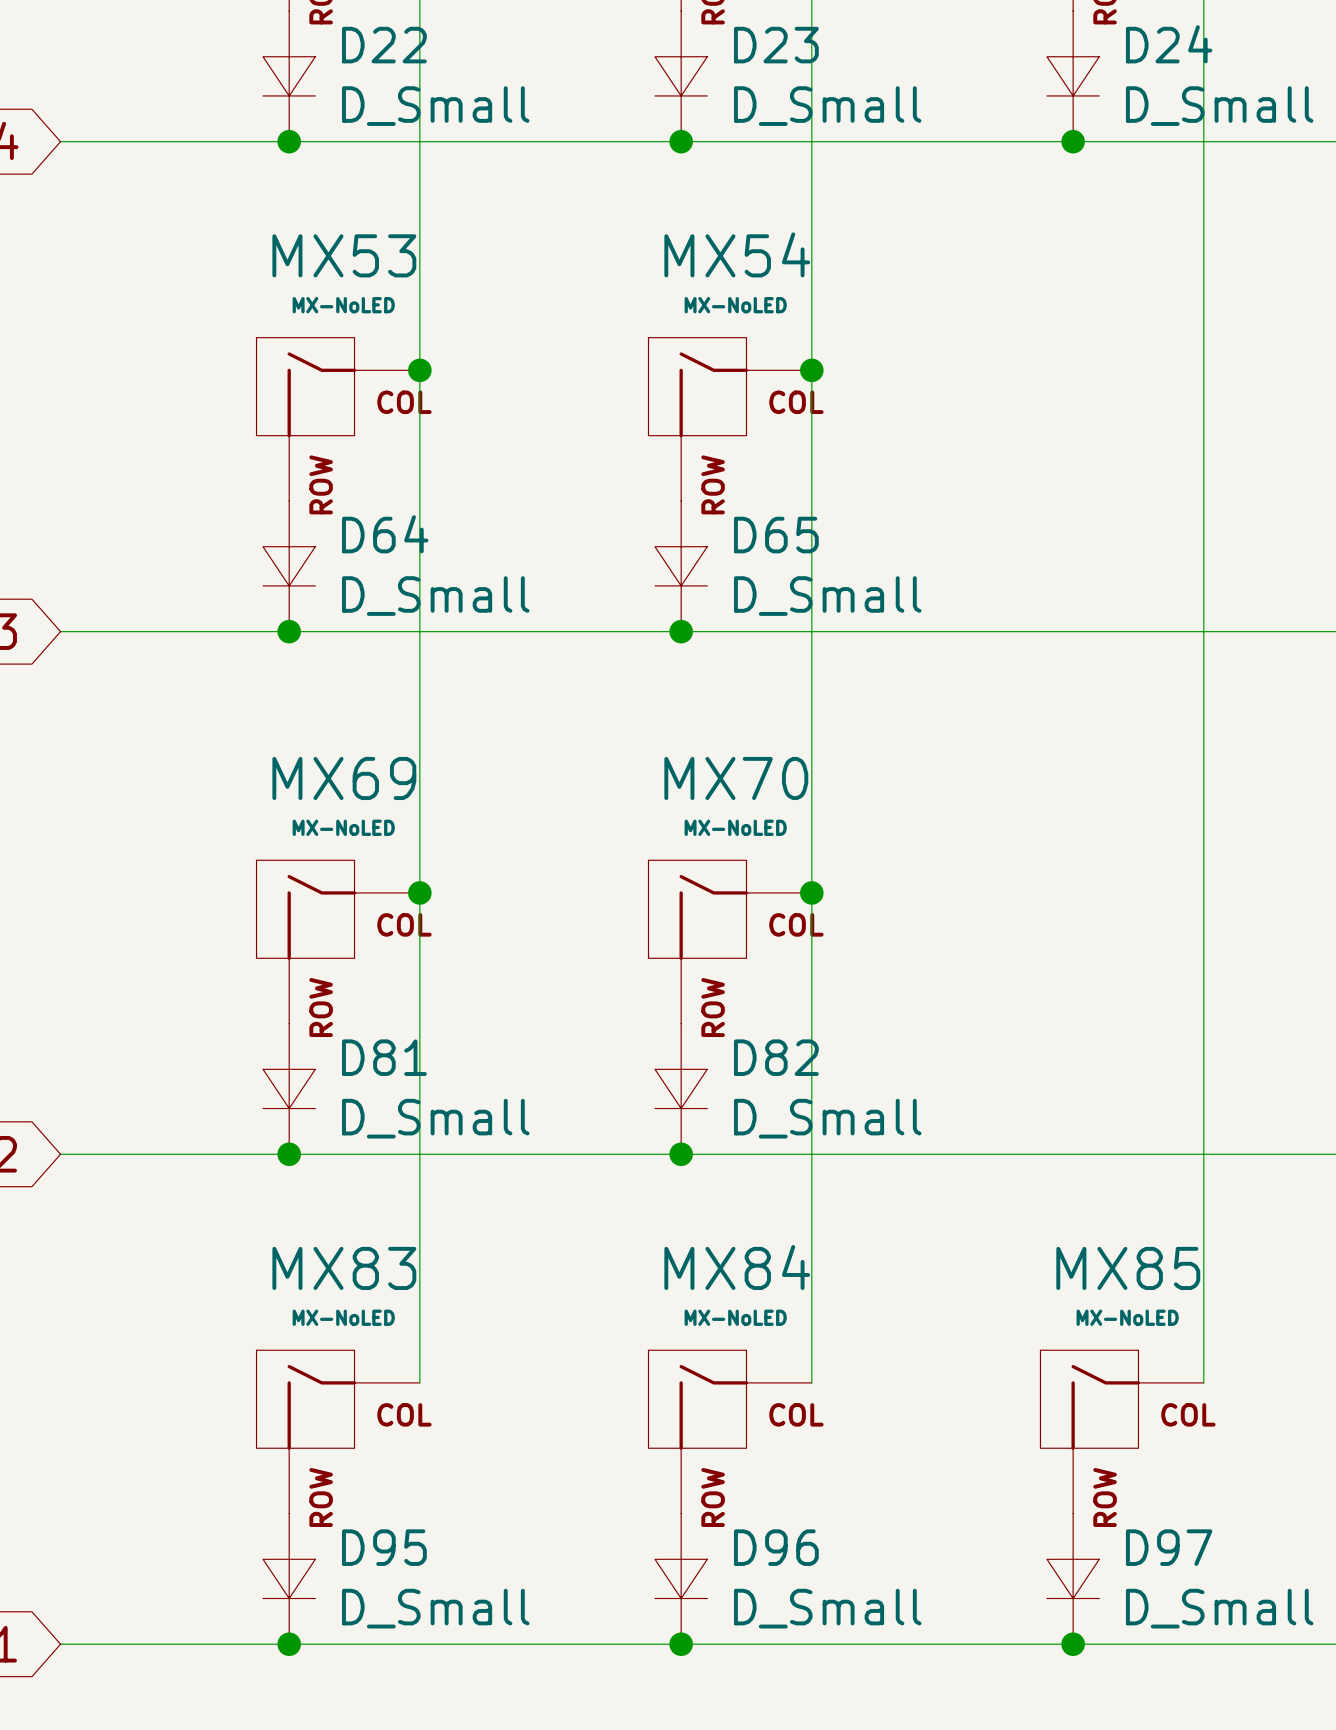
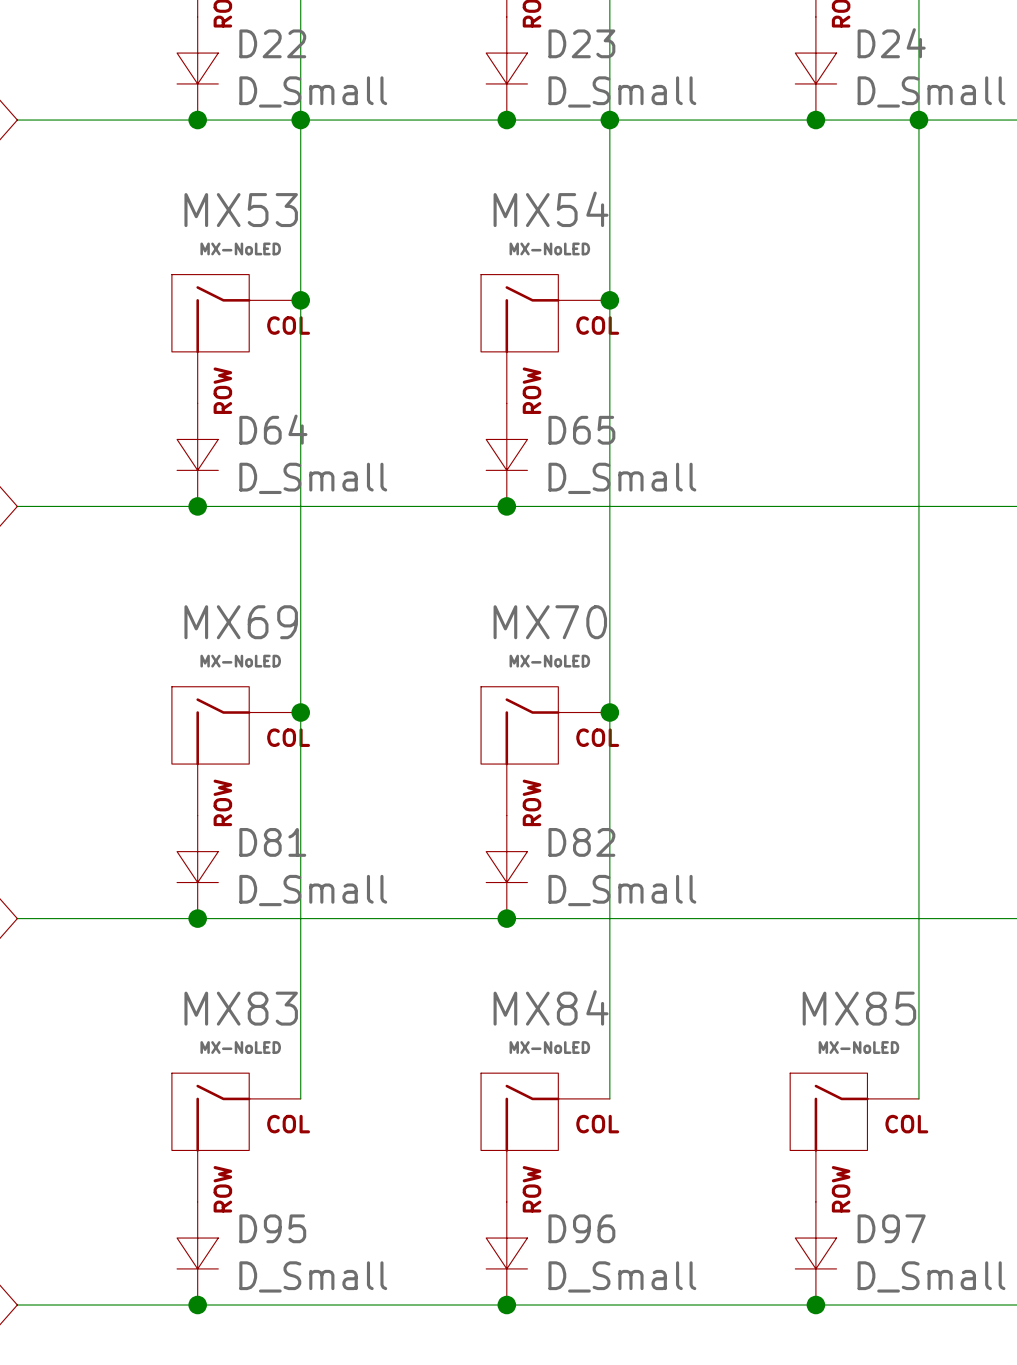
junction: none -> (300, 120)
junction: none -> (609, 120)
junction: none -> (918, 120)

